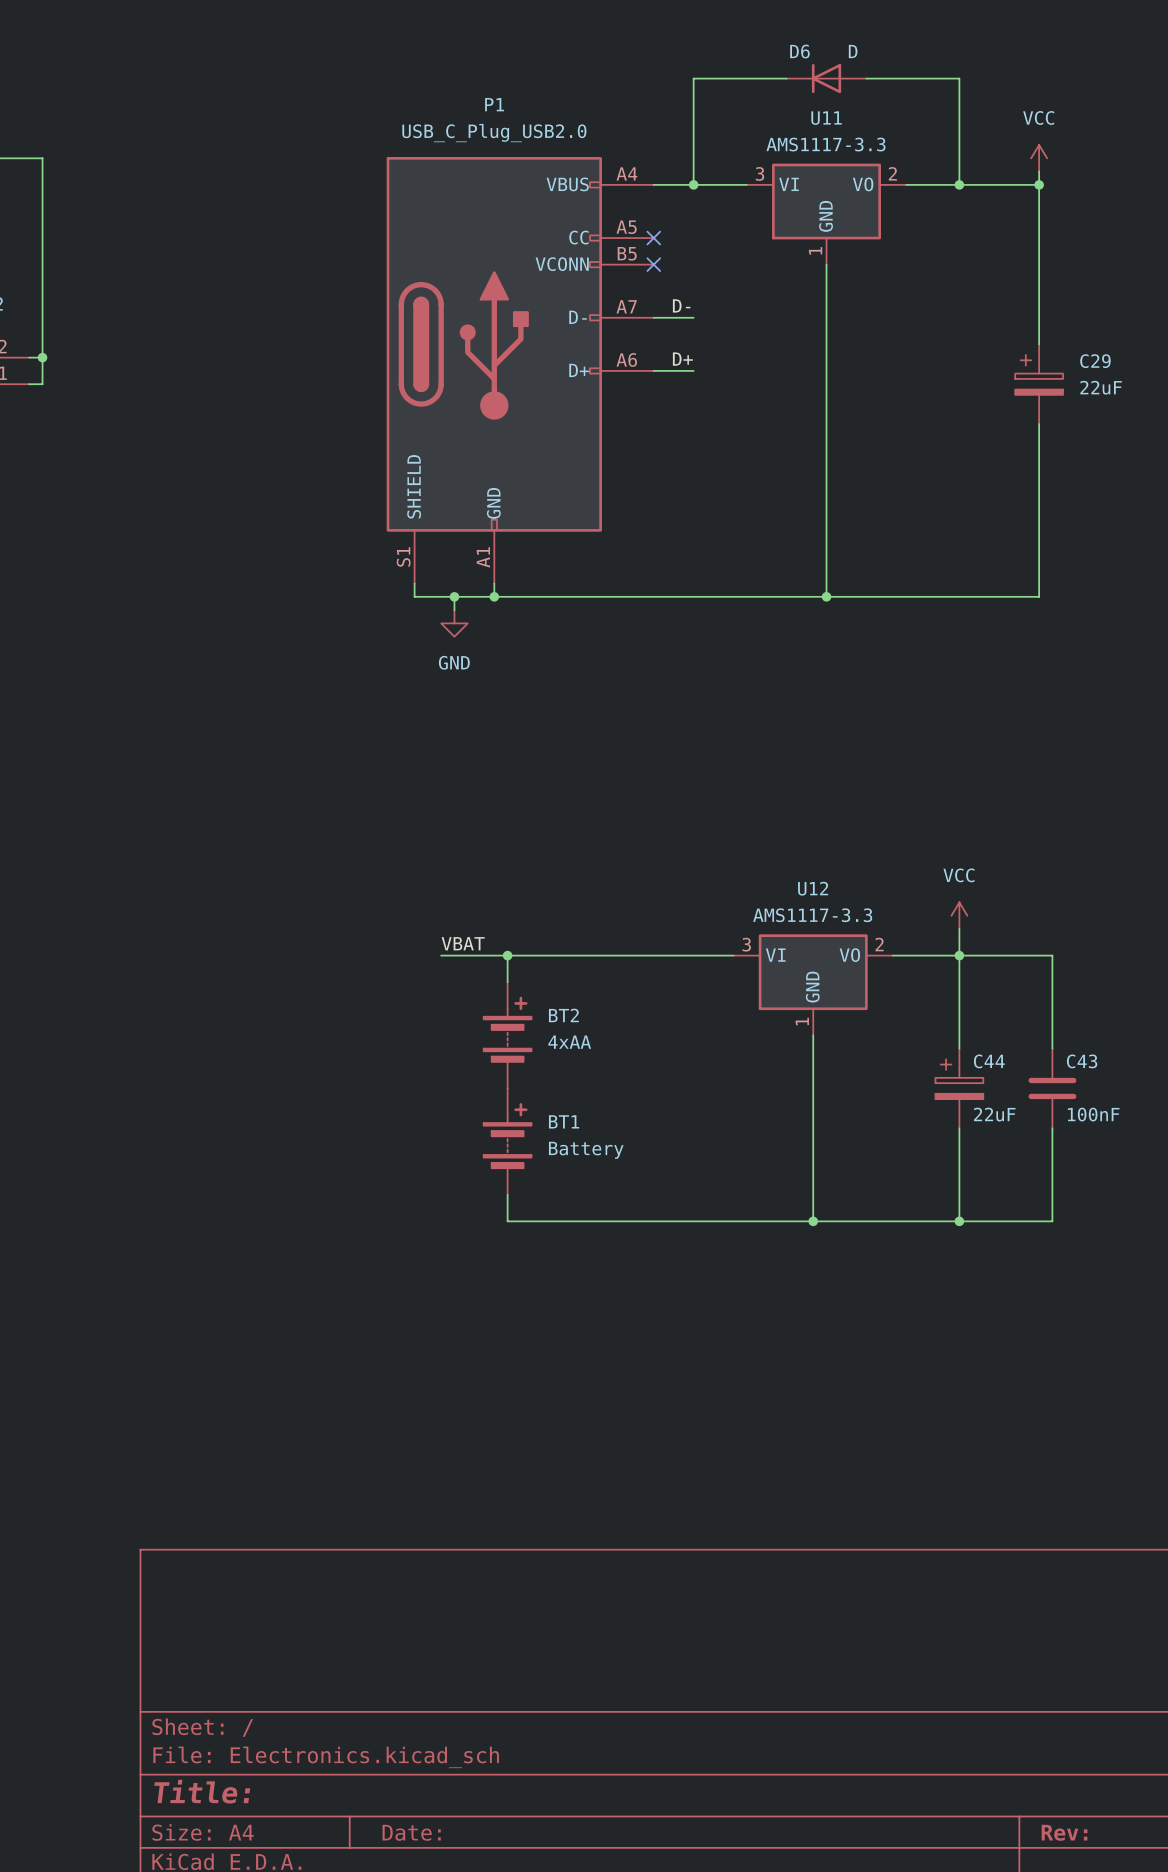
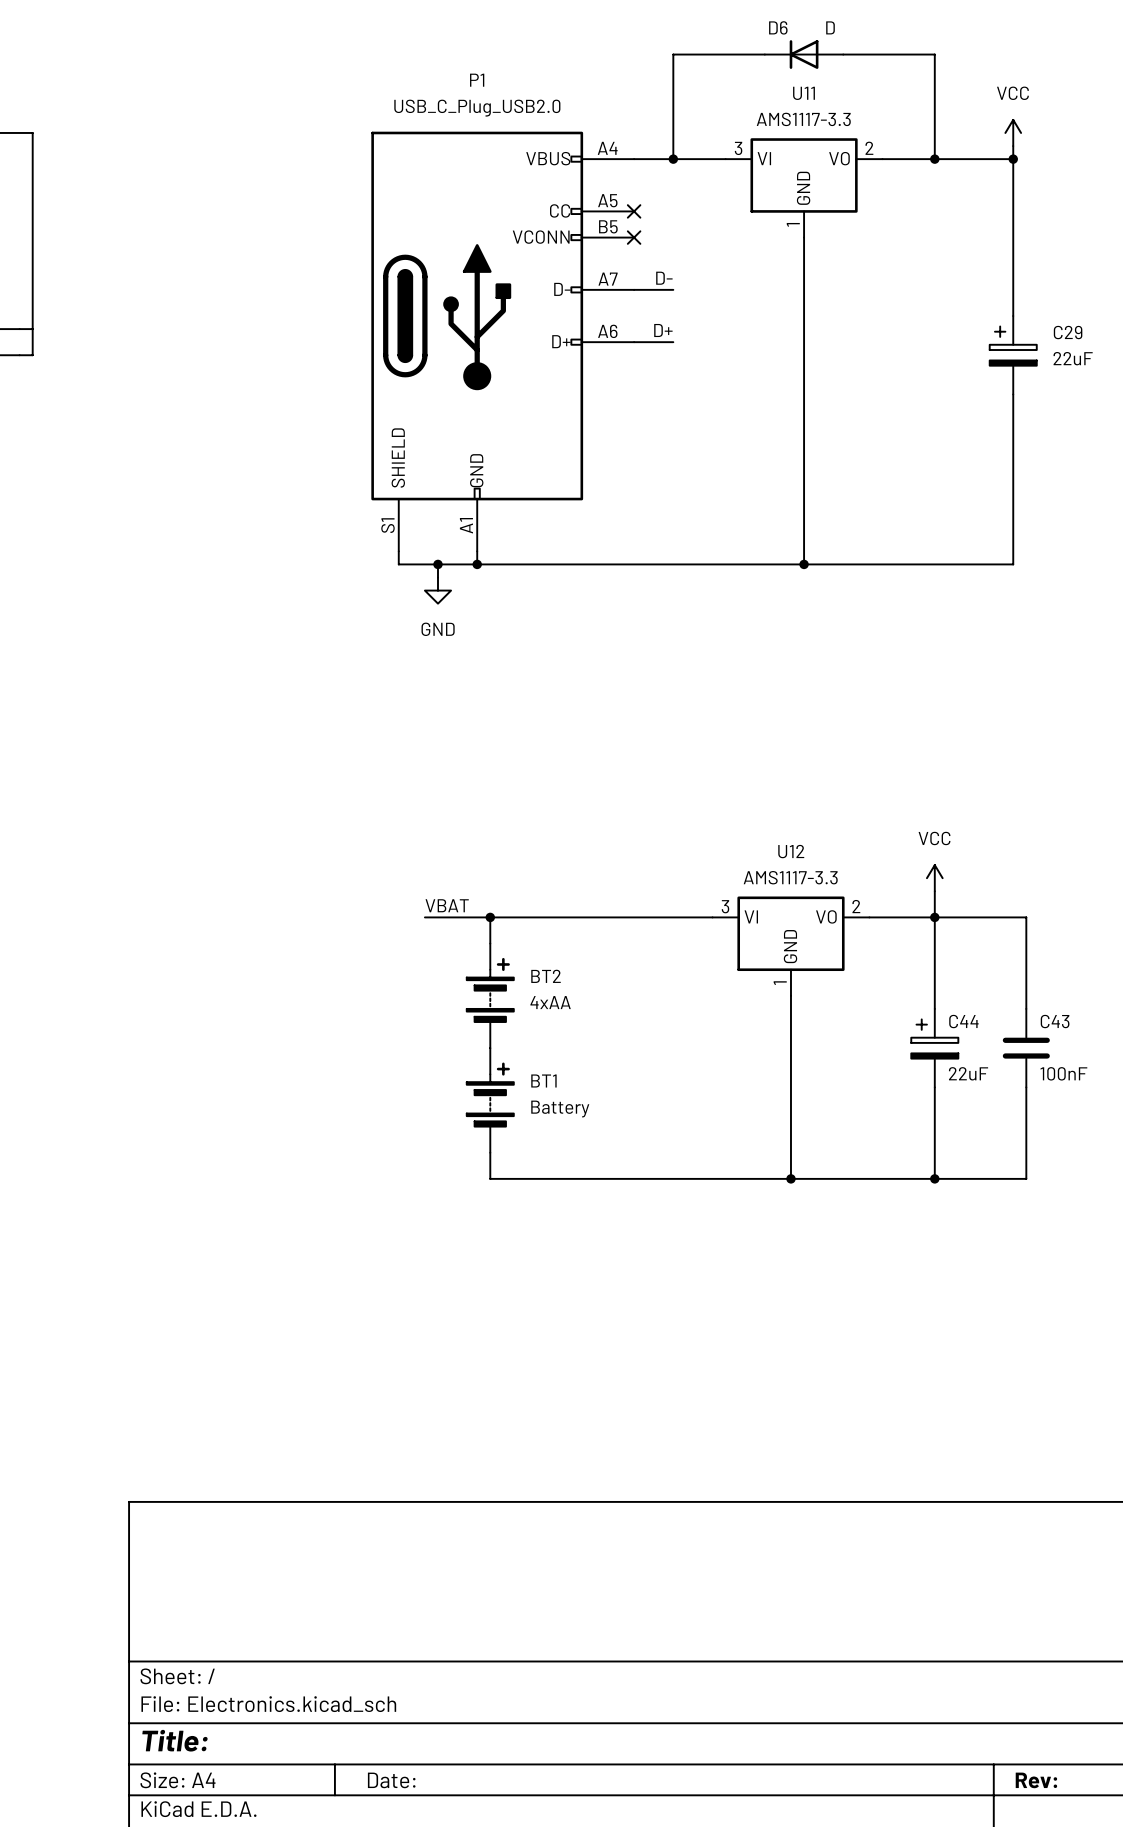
junction: (42, 357) -> none

